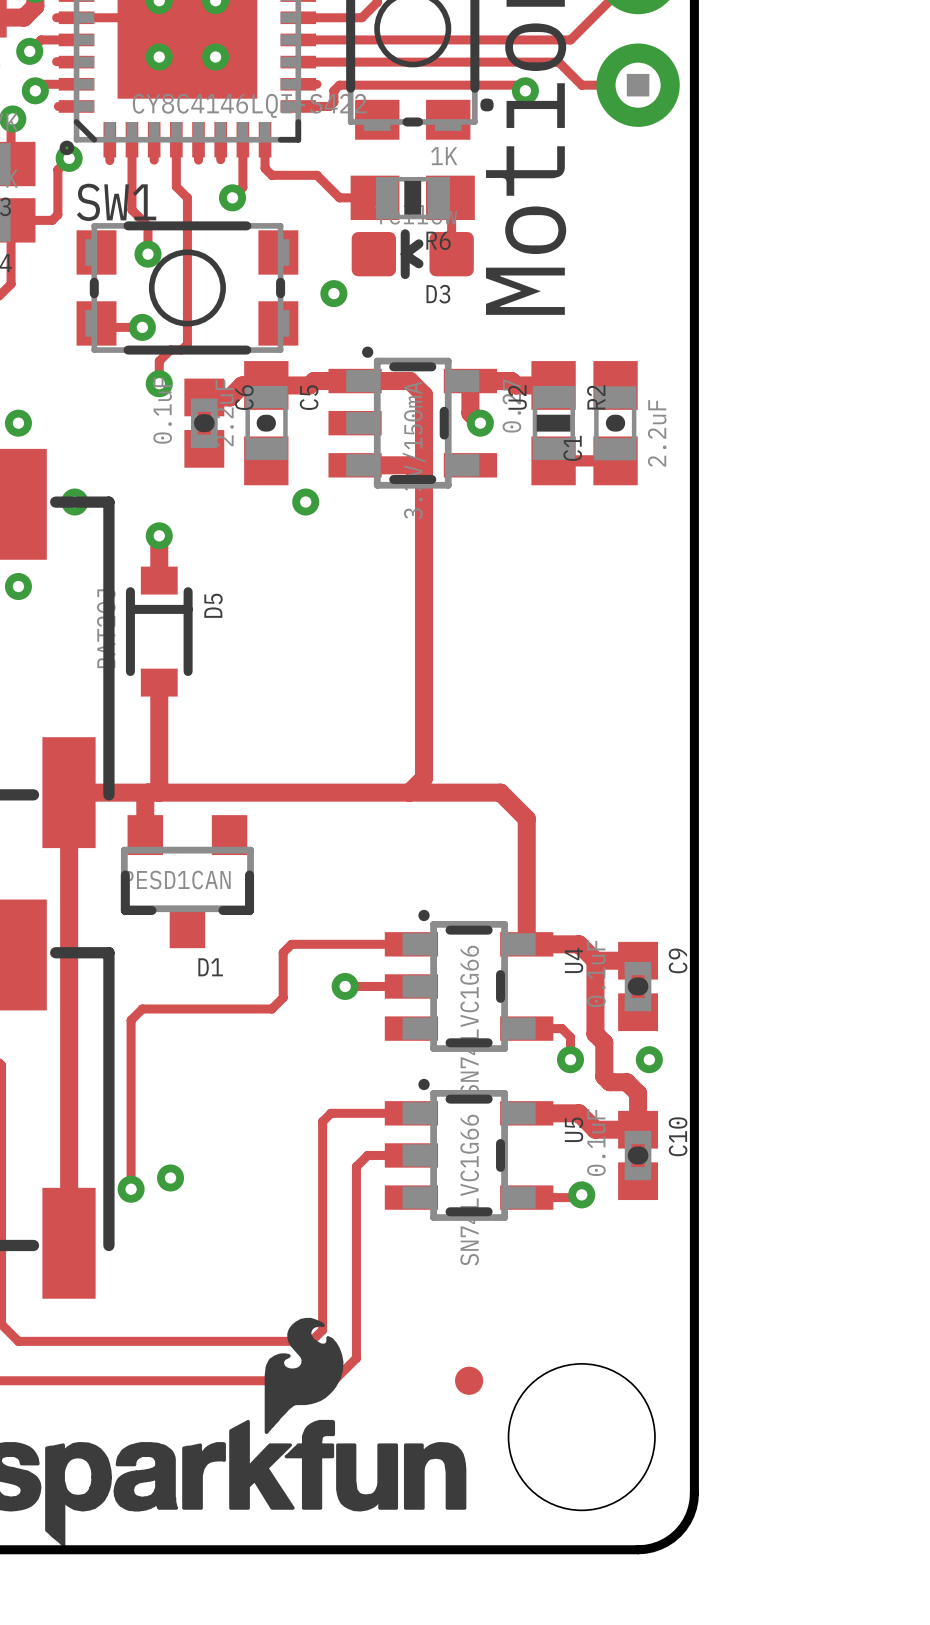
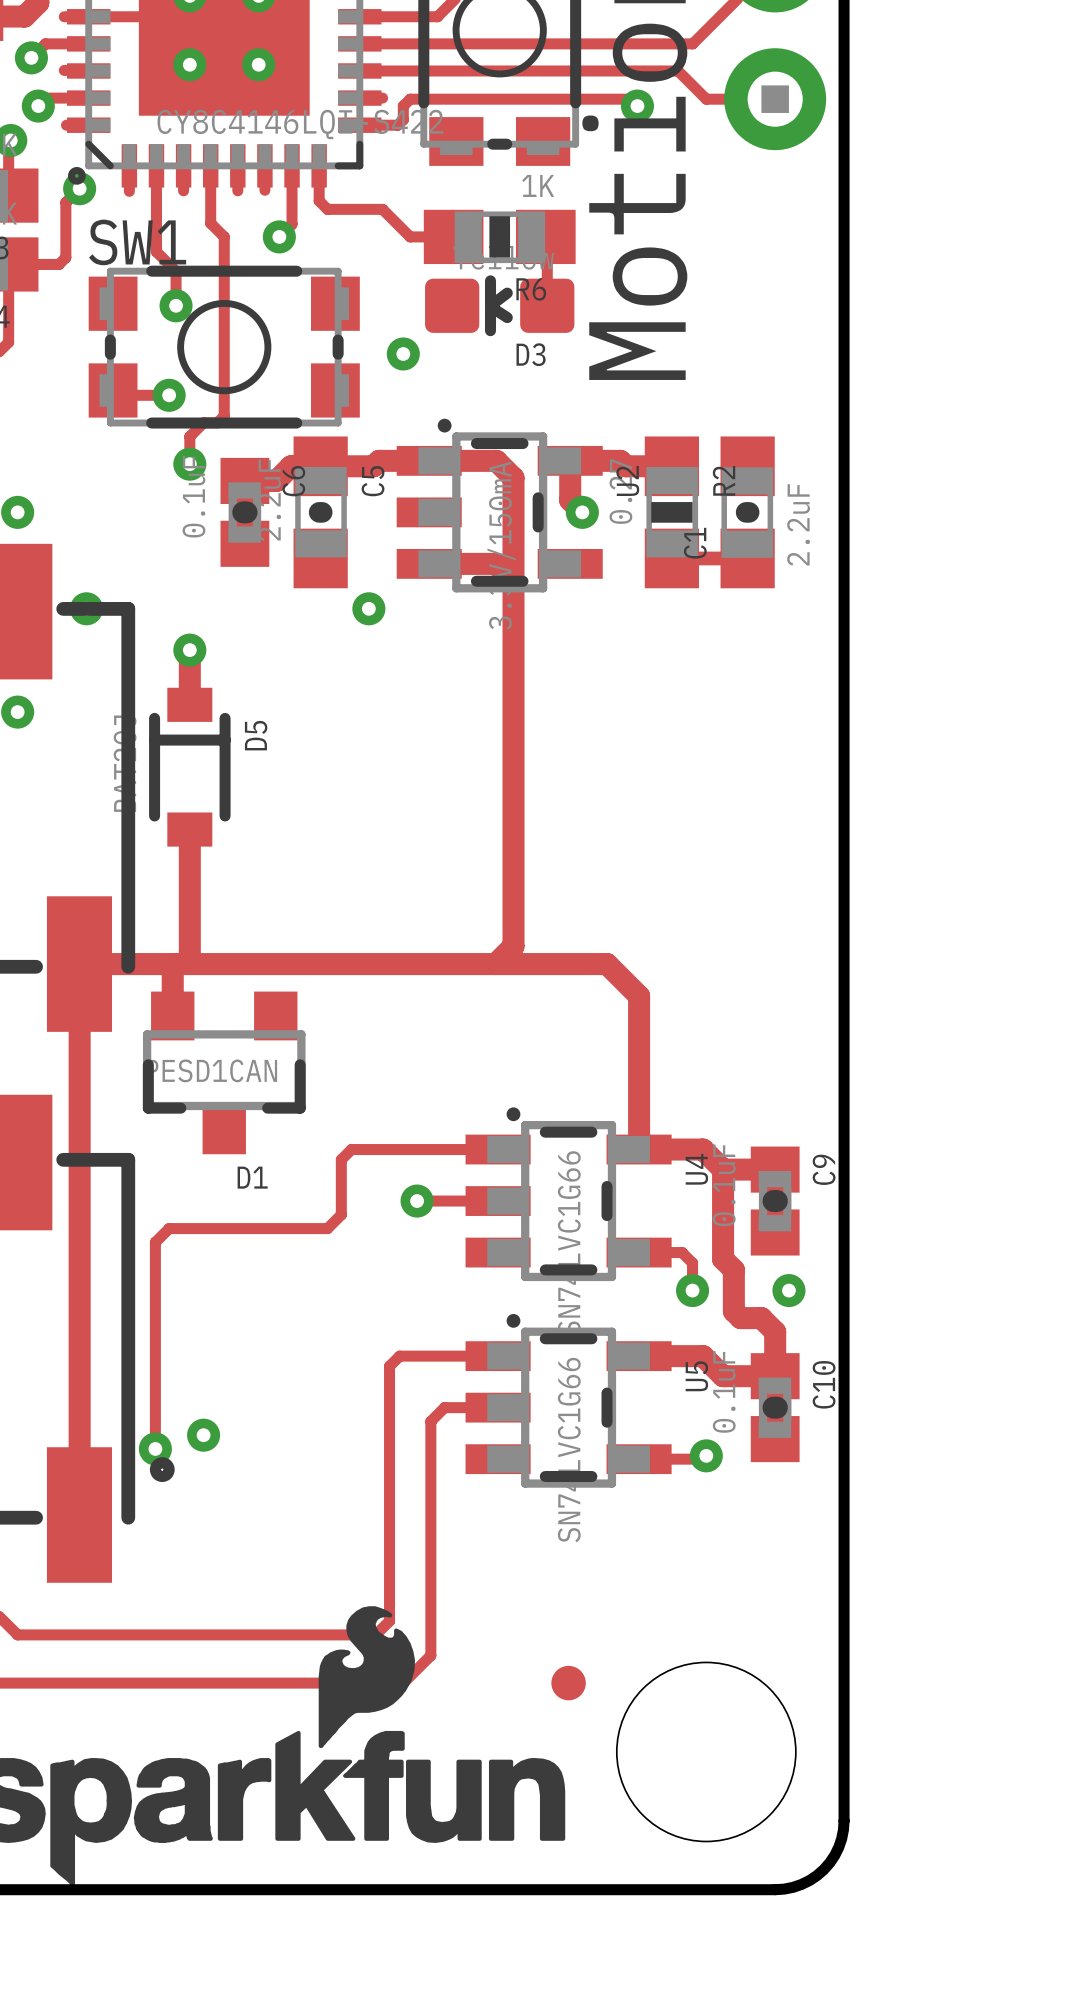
drawing: none -> [149, 1457, 175, 1483]

